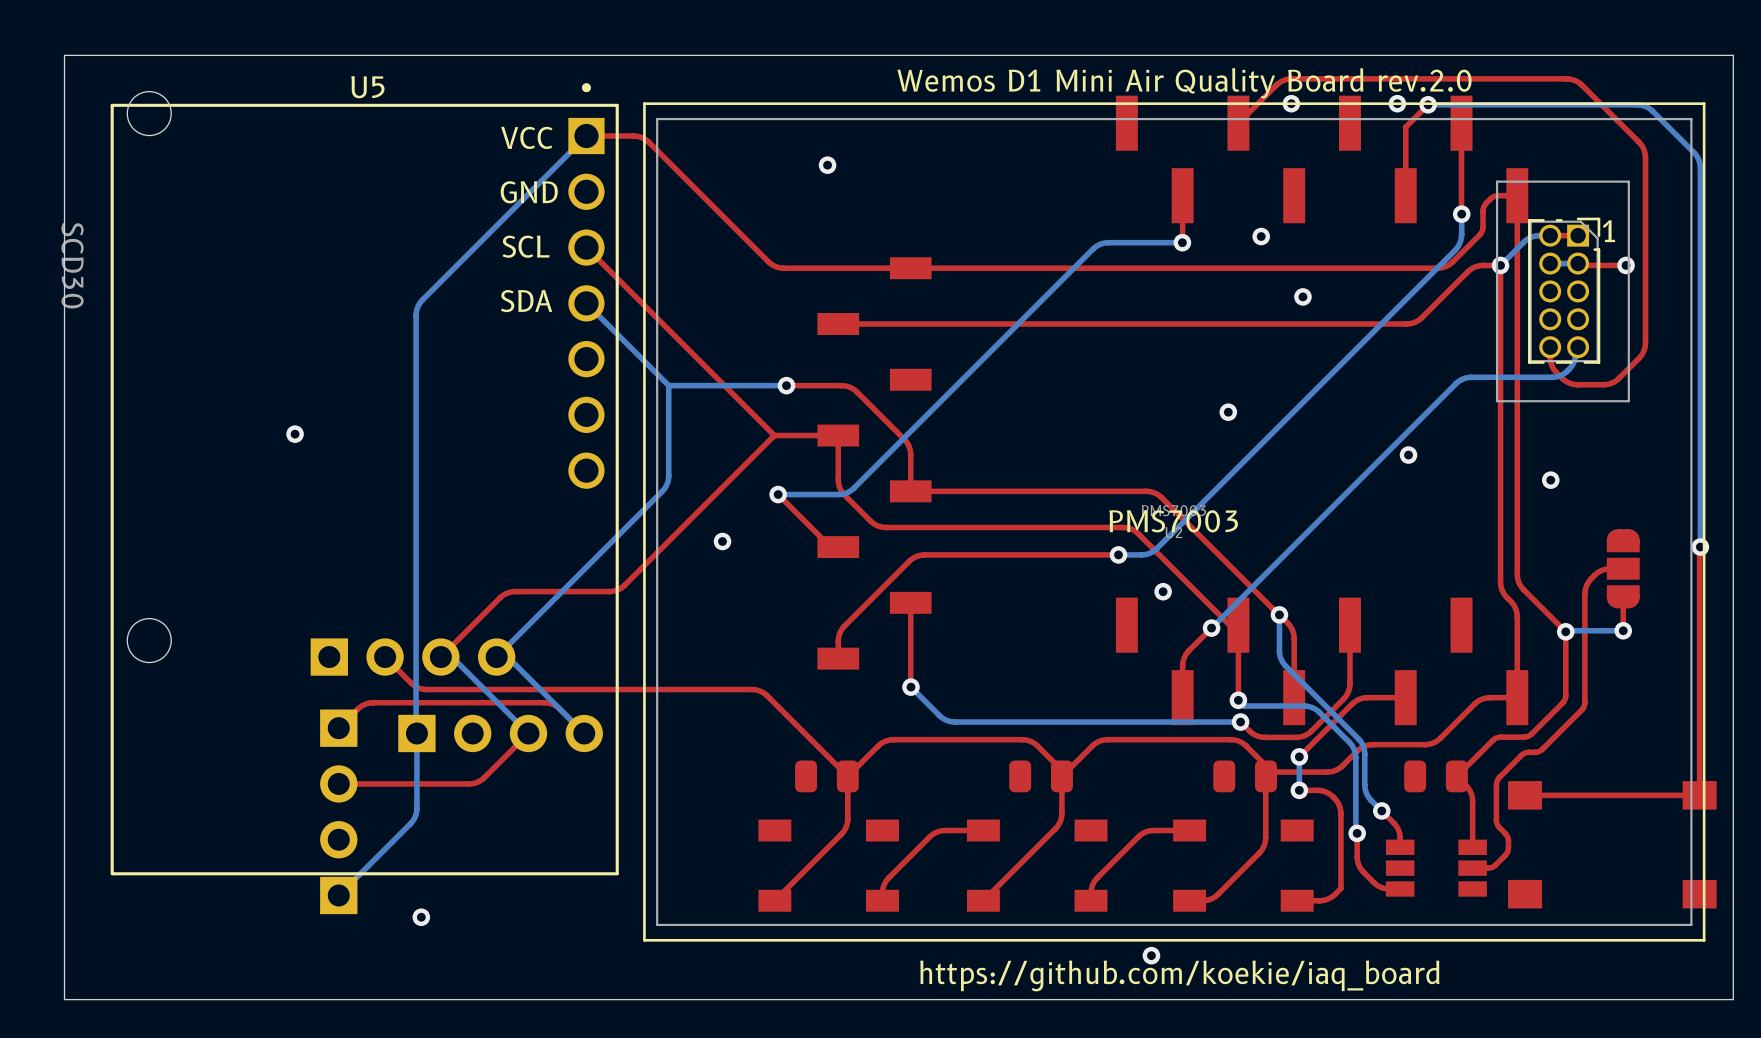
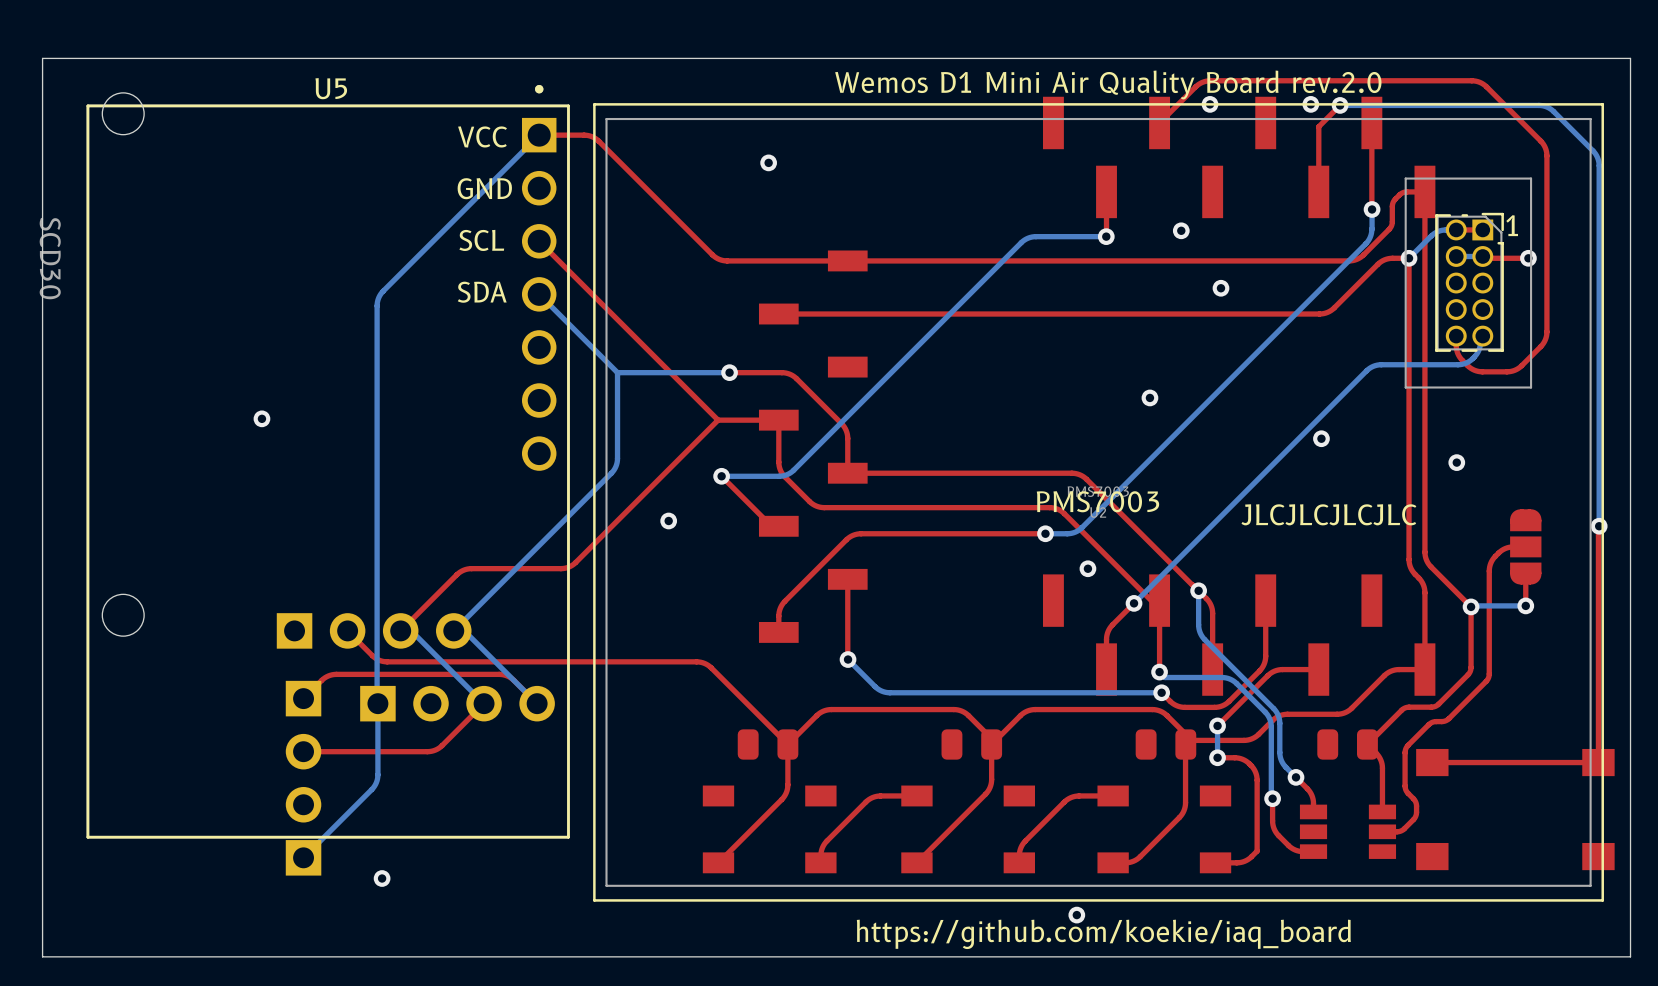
text: none -> JLCJLCJLCJLC (1328, 514)

